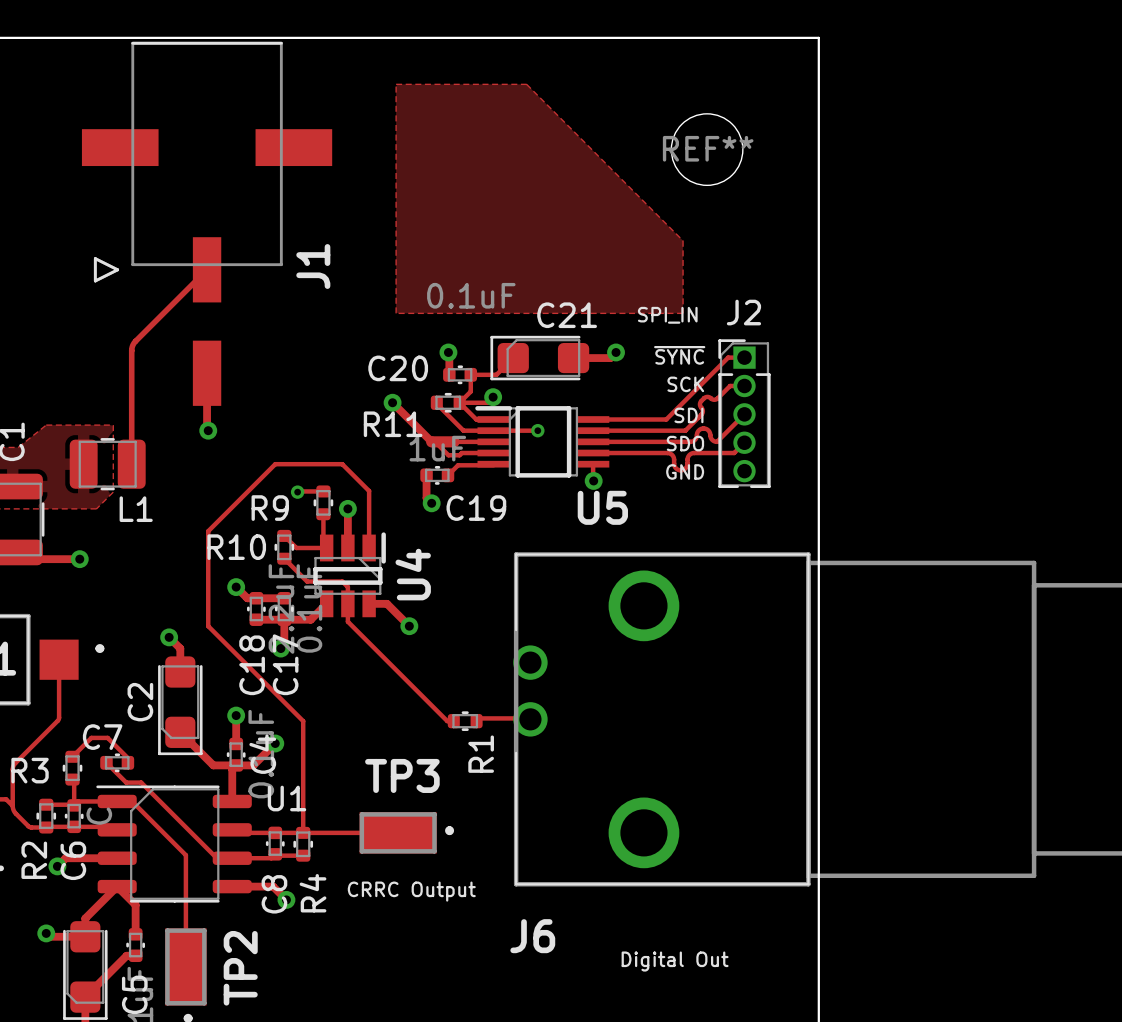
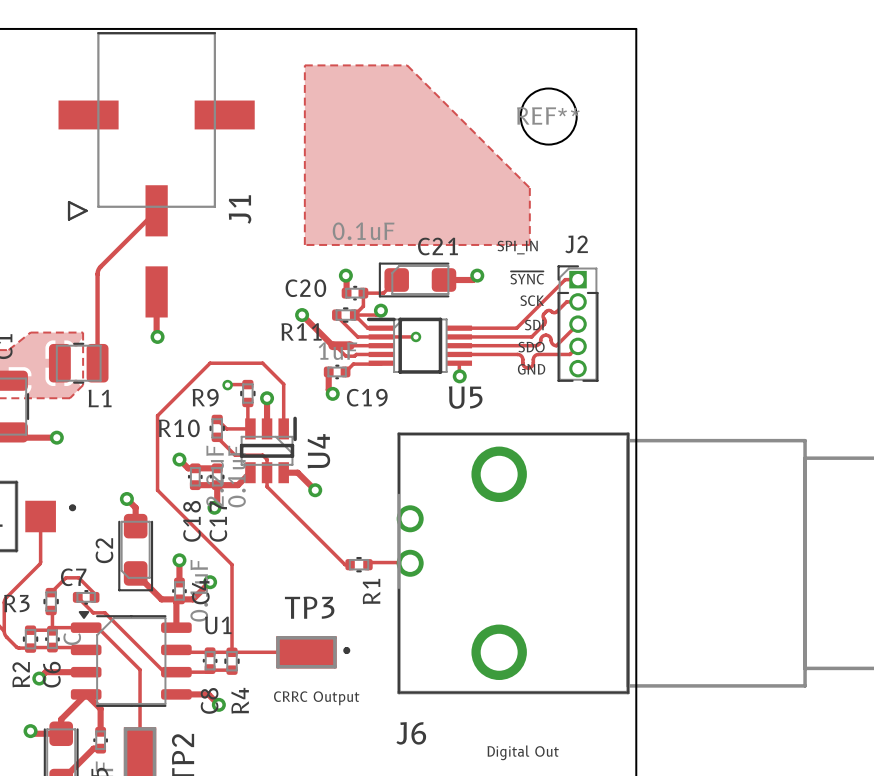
U1 footprint: [96, 785, 252, 903] -> [70, 611, 192, 707]

